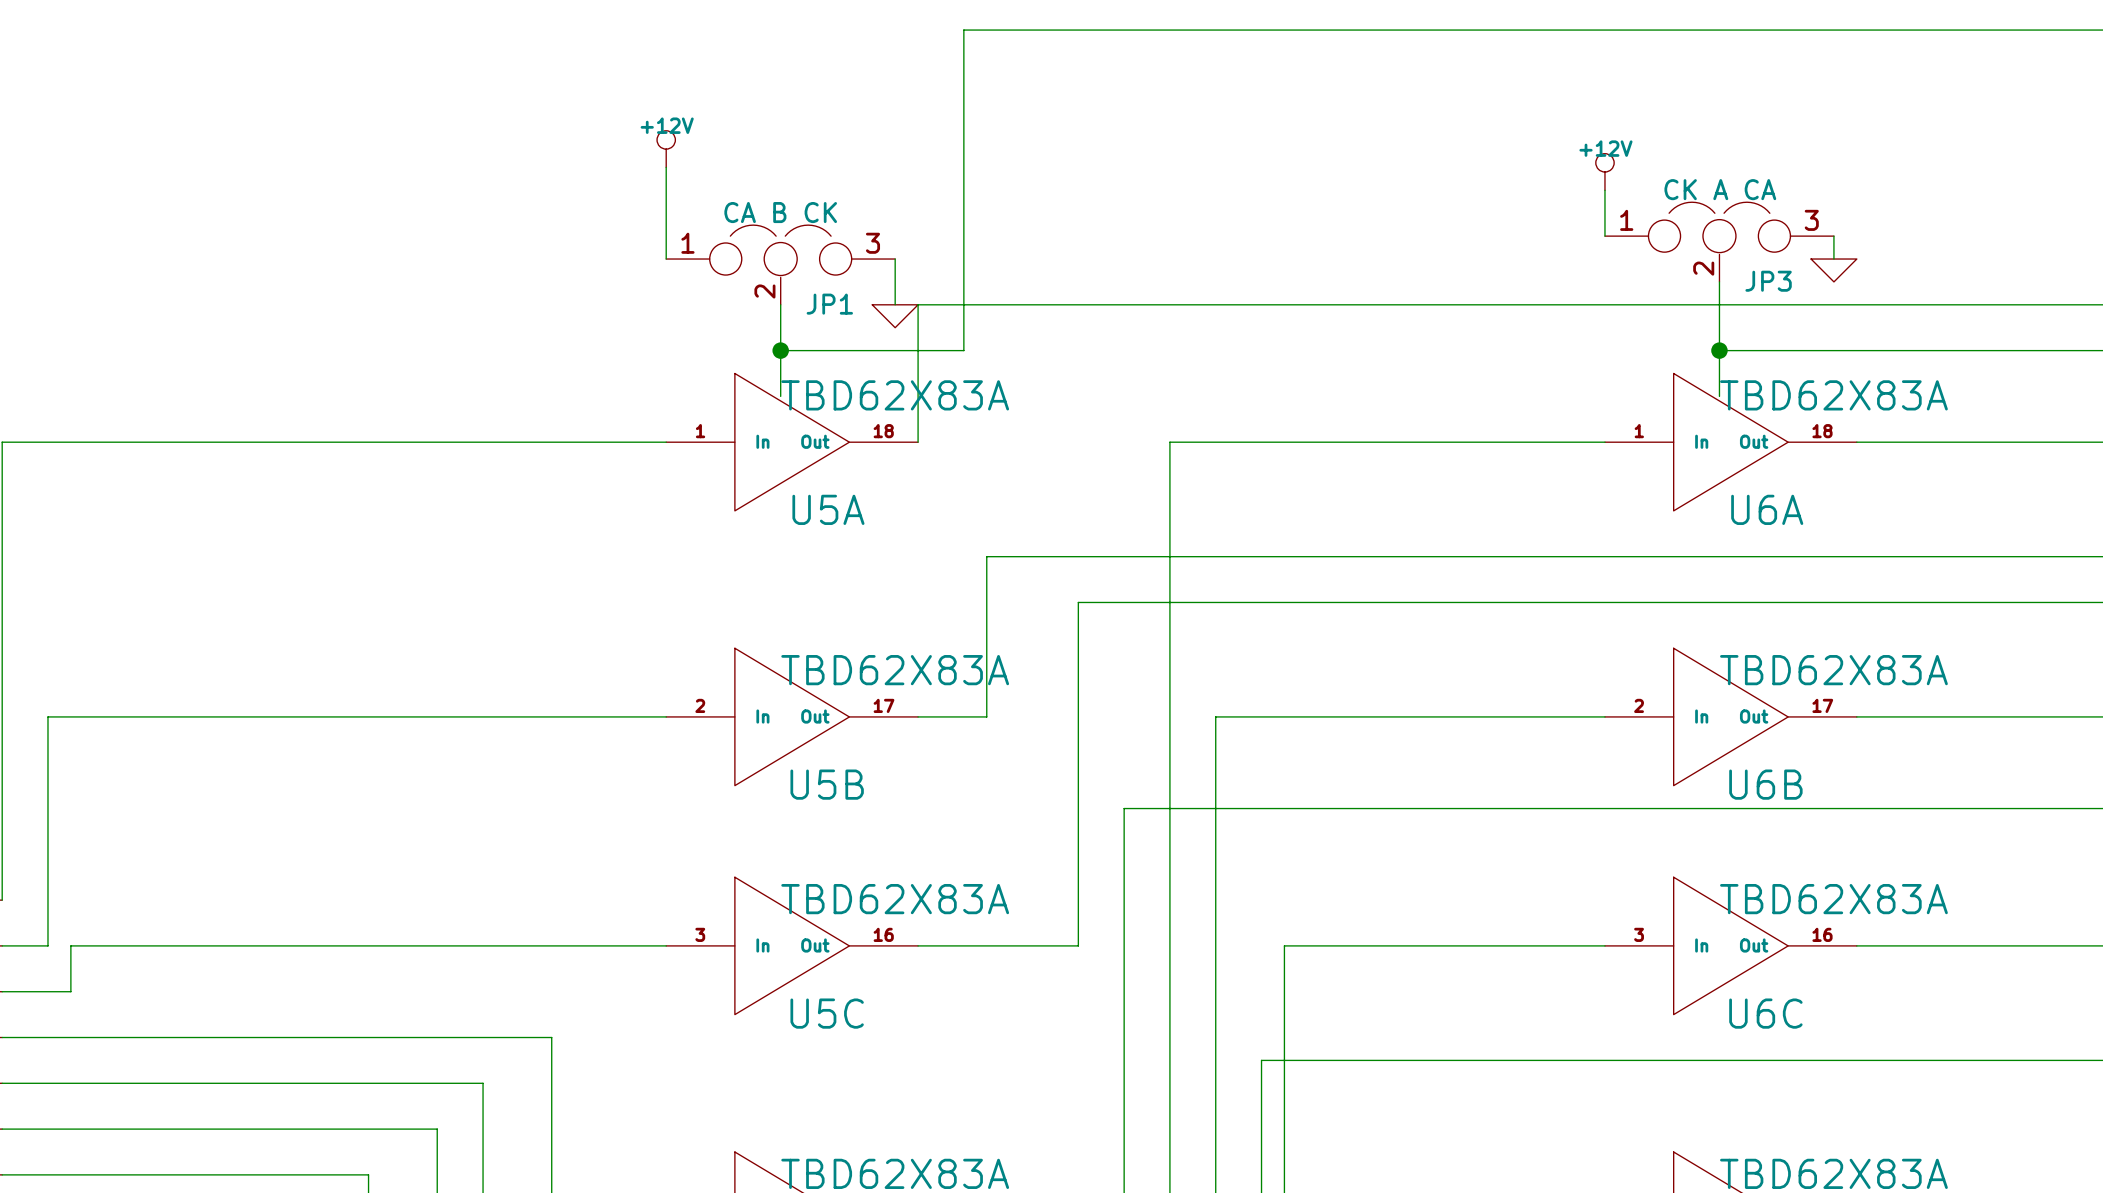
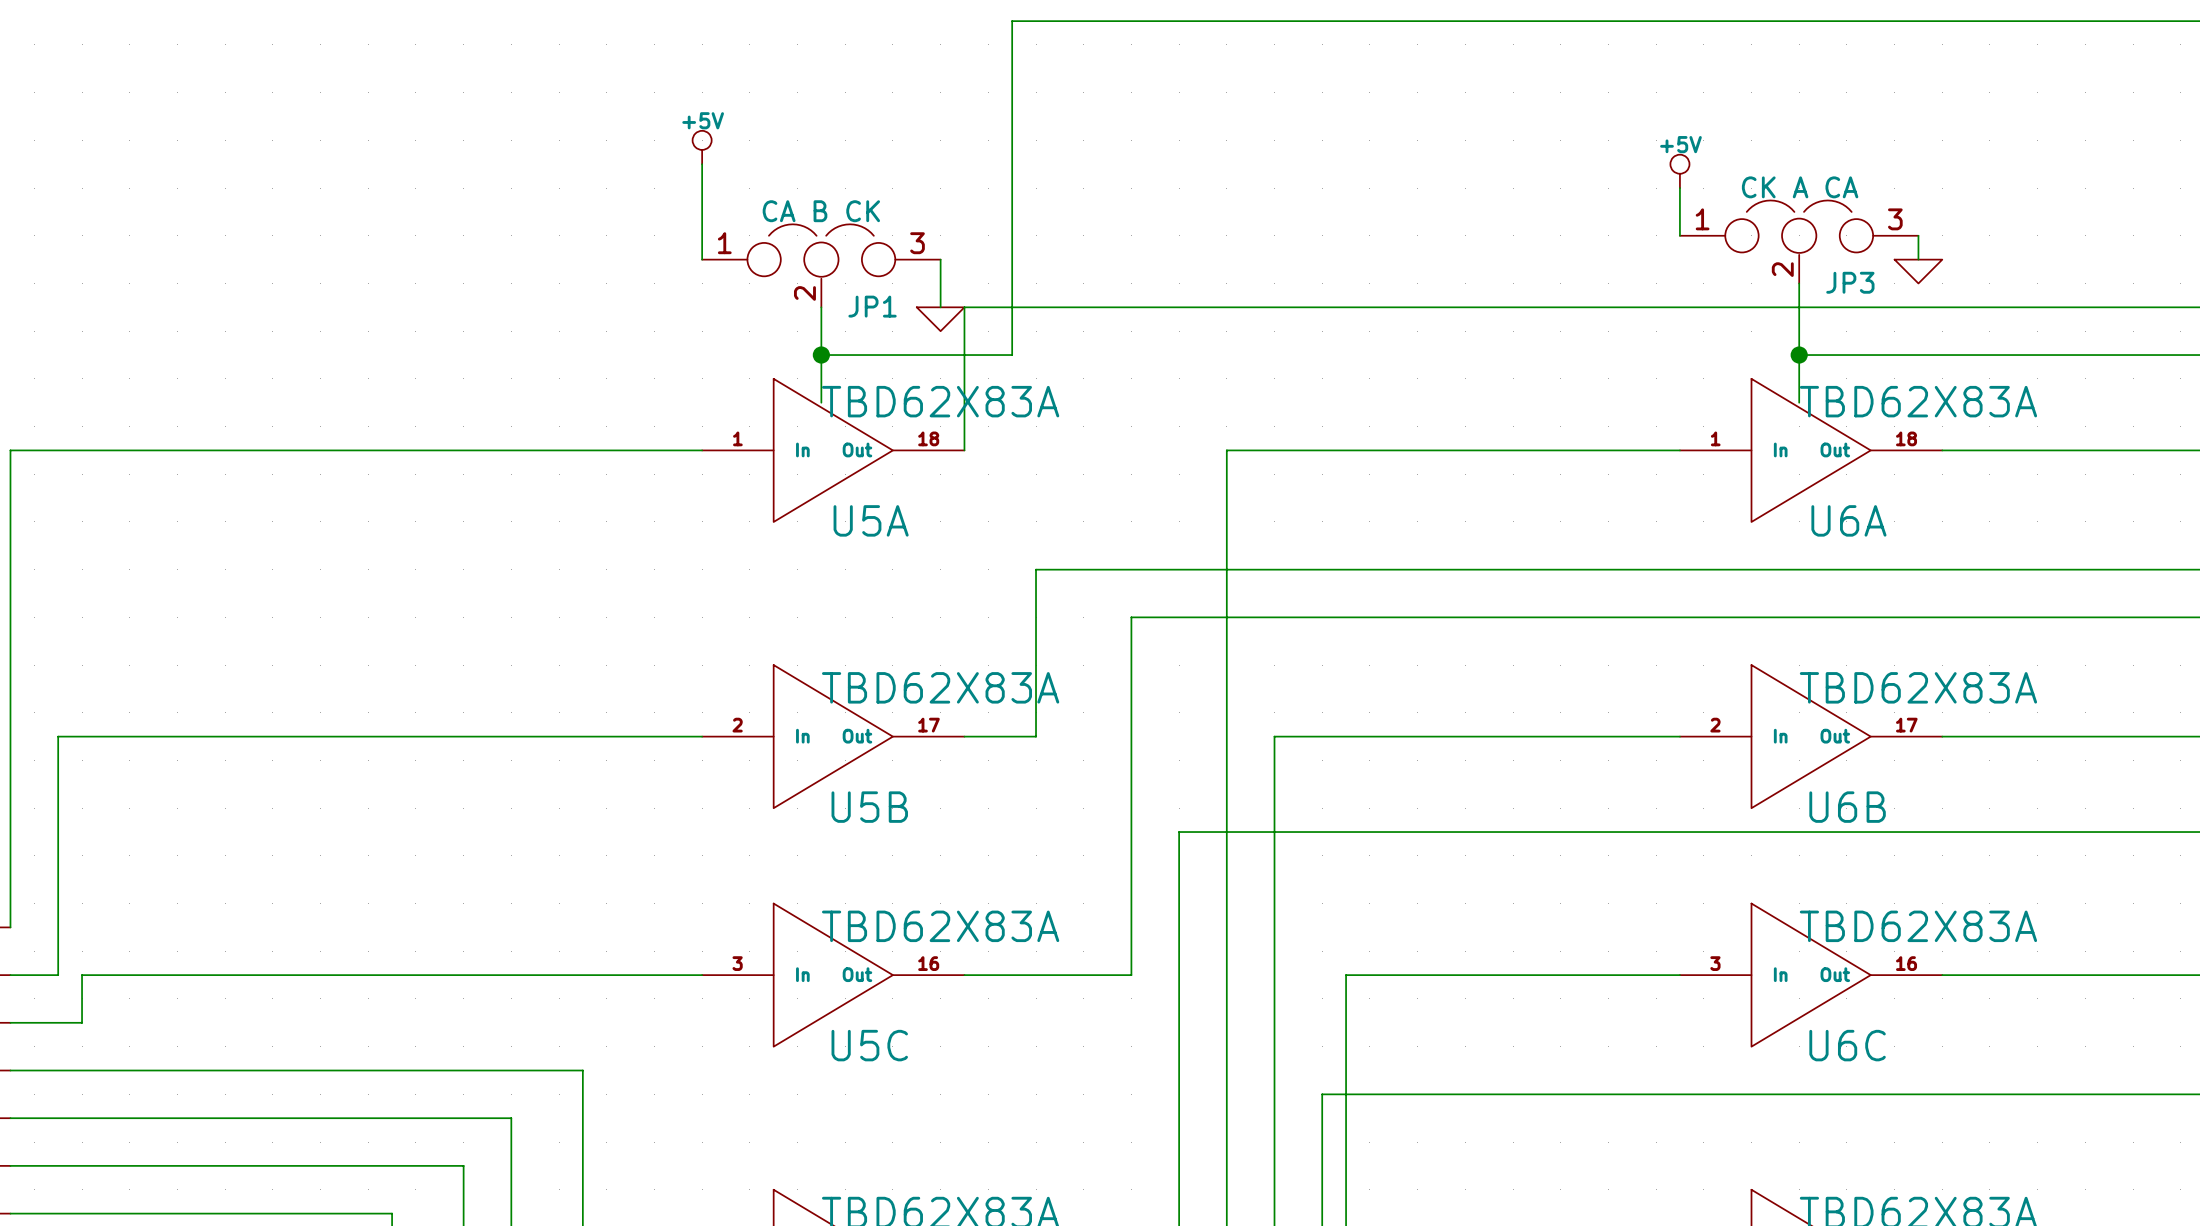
power symbol: +12V (666, 149) -> +5V (702, 147)
power symbol: +12V (1604, 172) -> +5V (1679, 171)

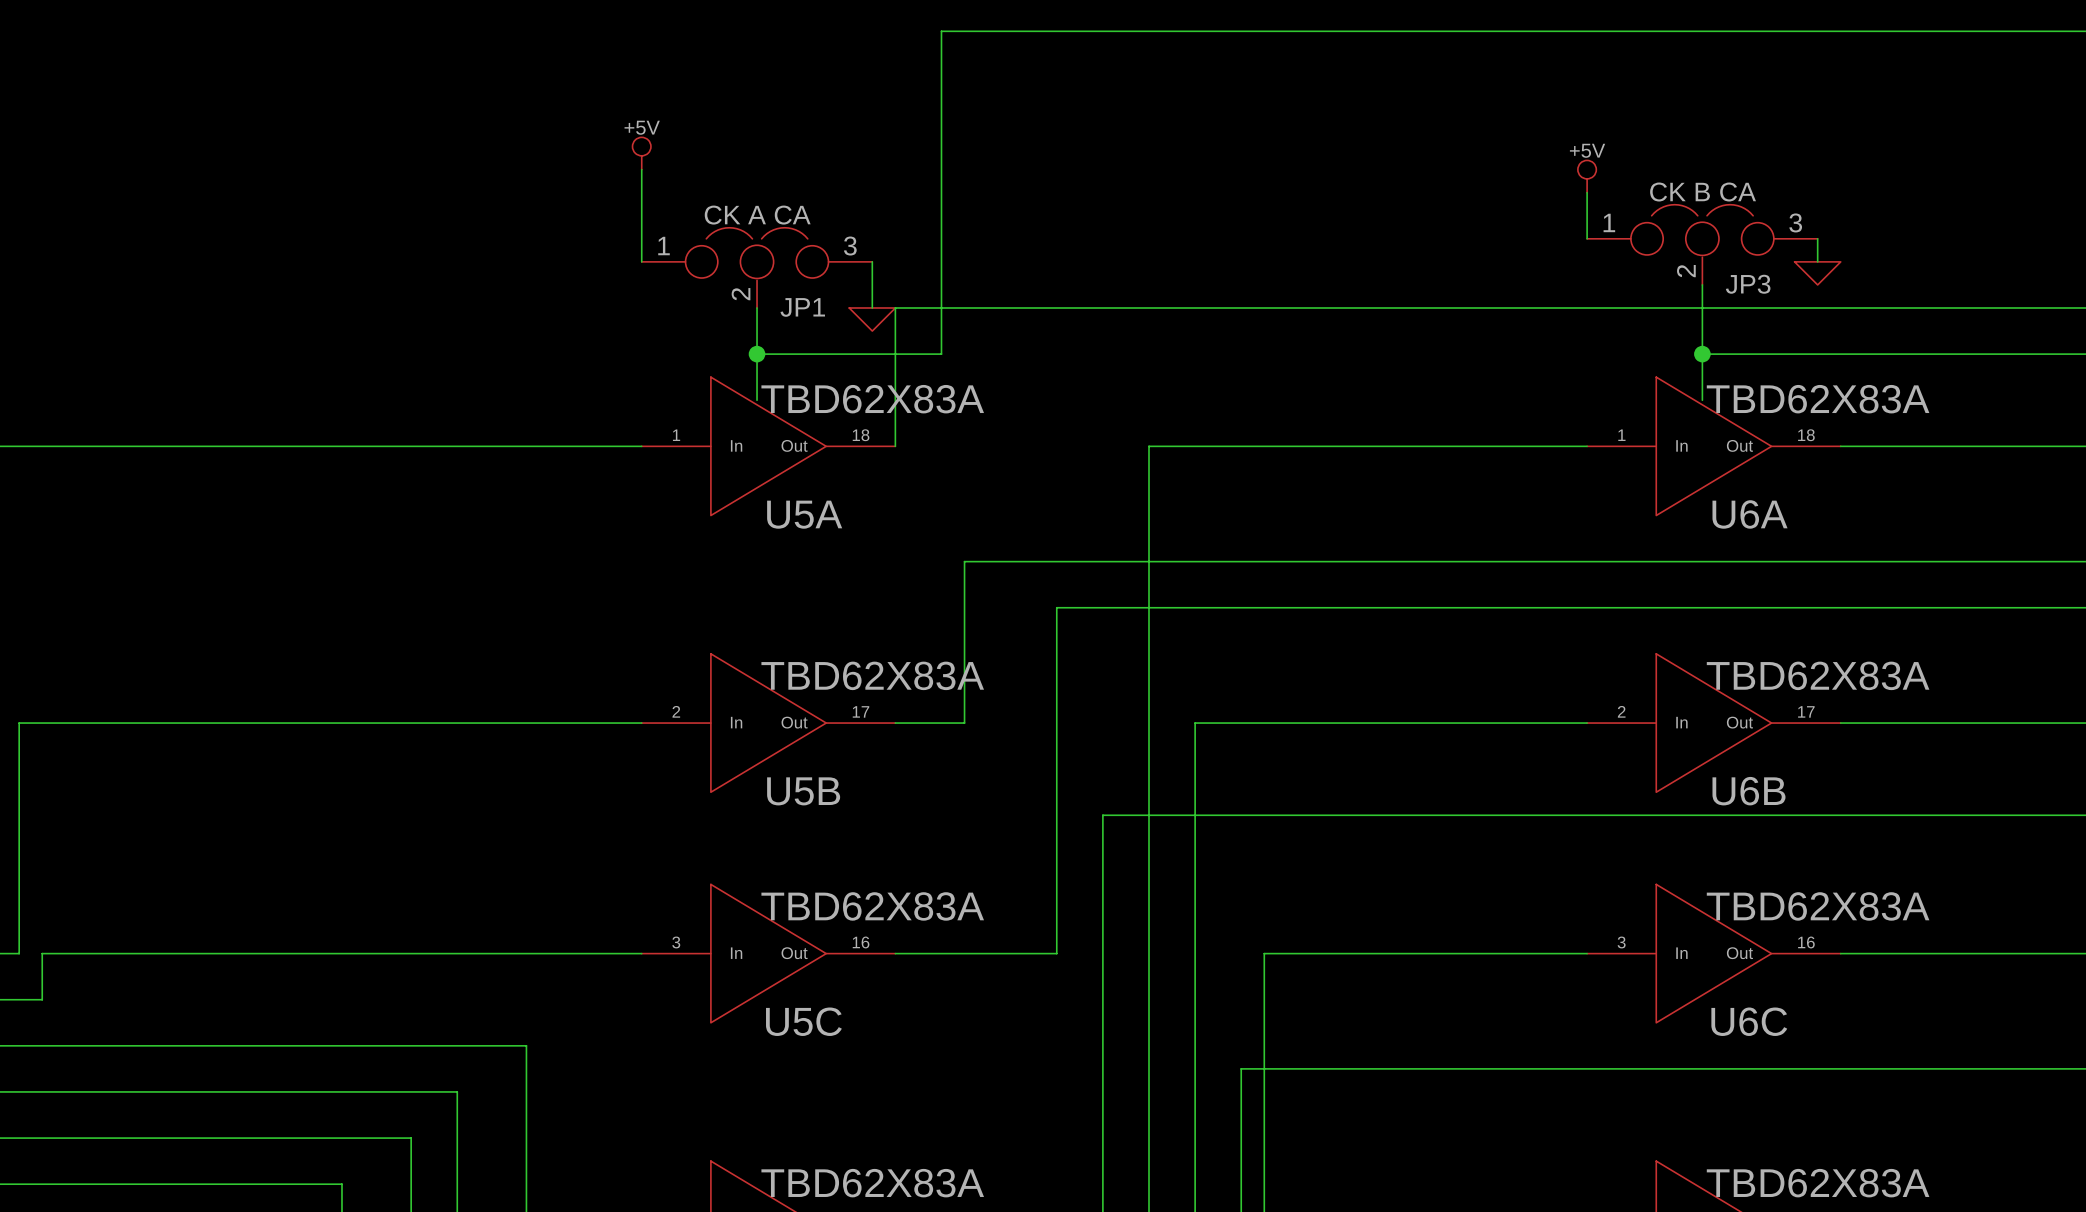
JP3 value: CK A CA (1800, 187) -> CK B CA (1703, 192)
JP1 value: CA B CK (821, 211) -> CK A CA (757, 215)

